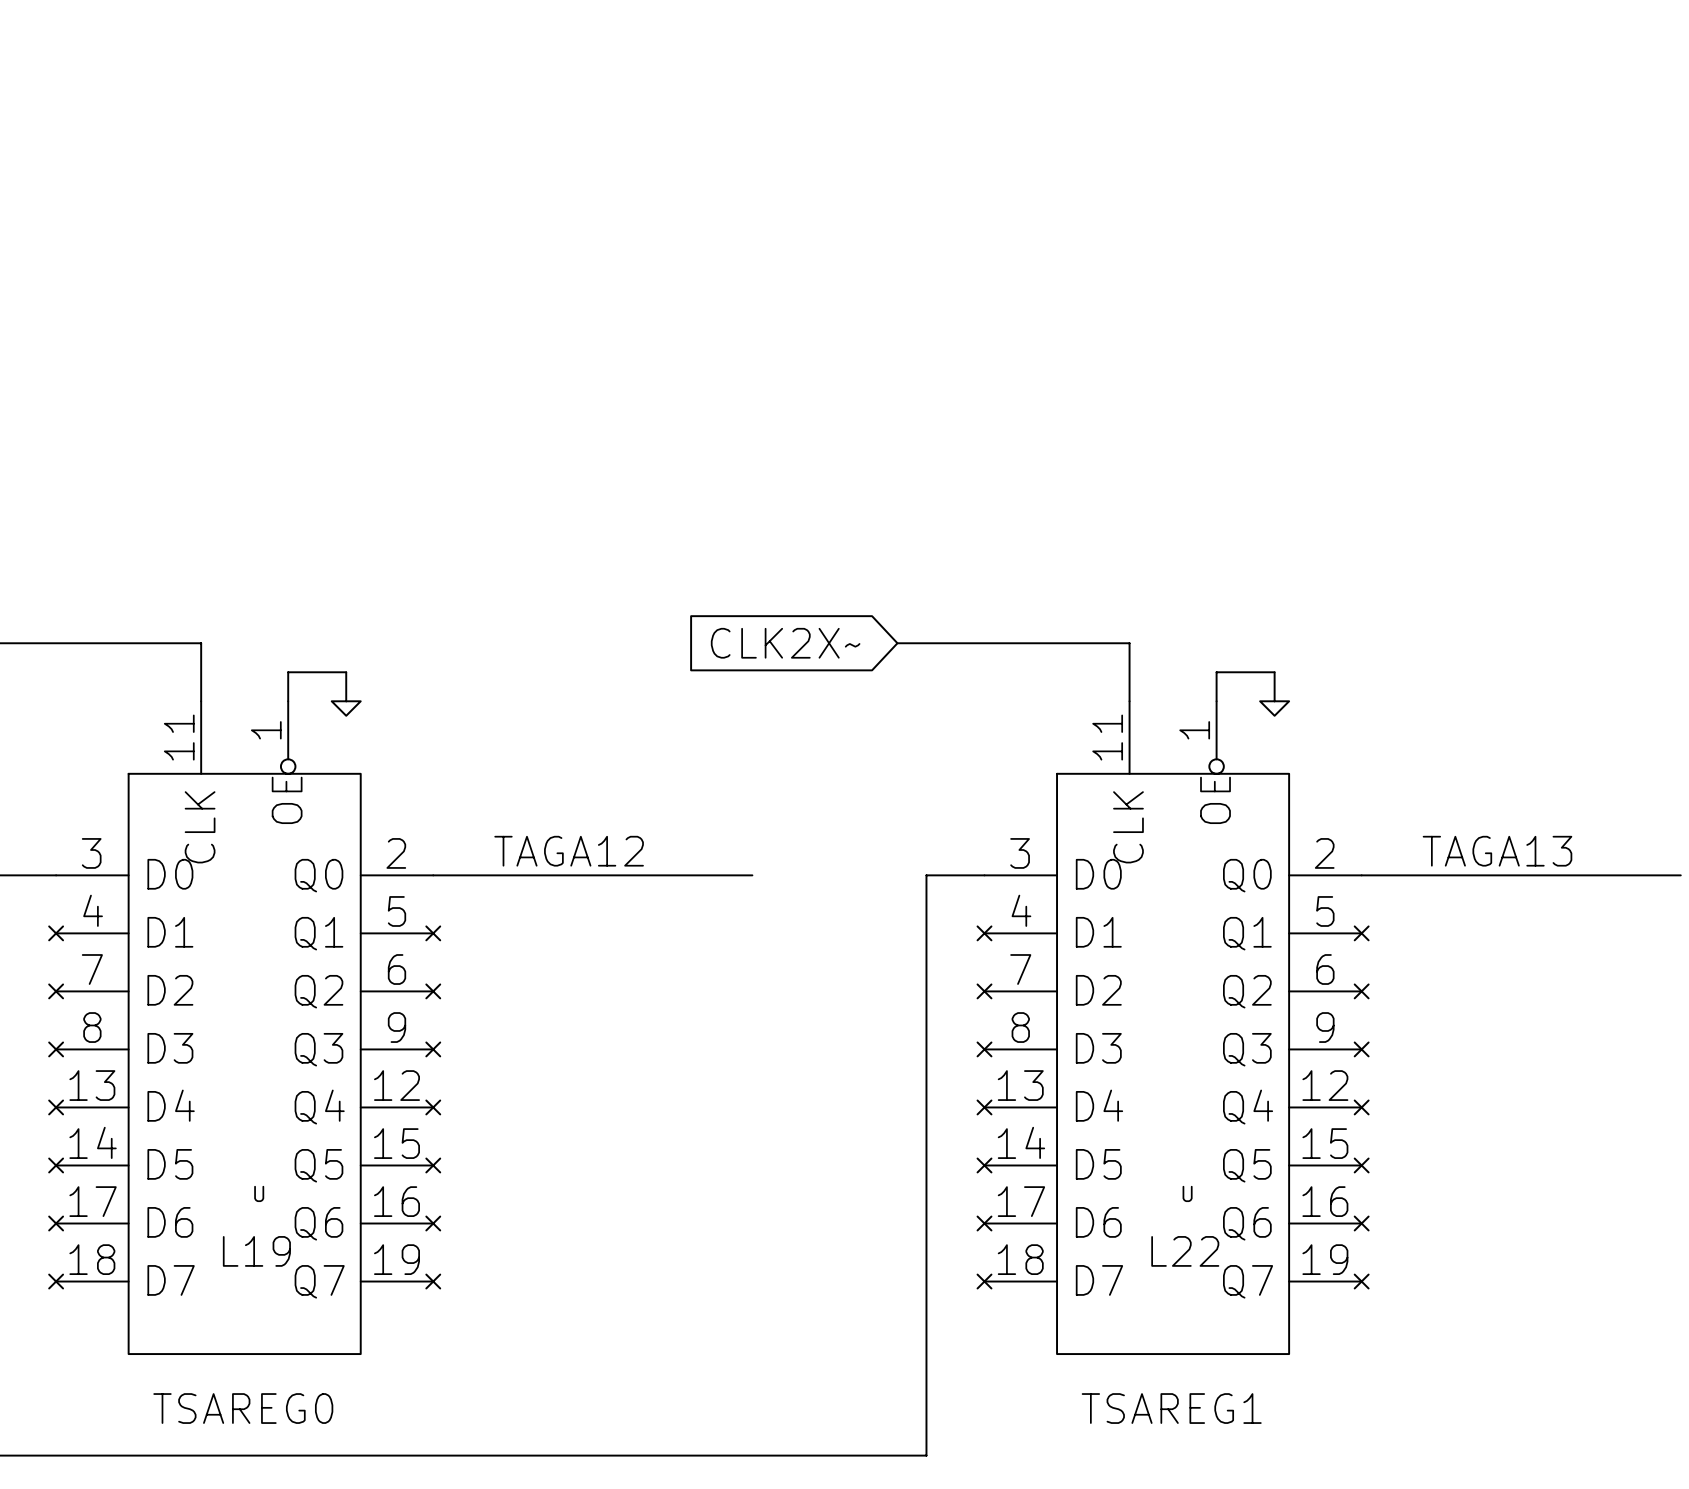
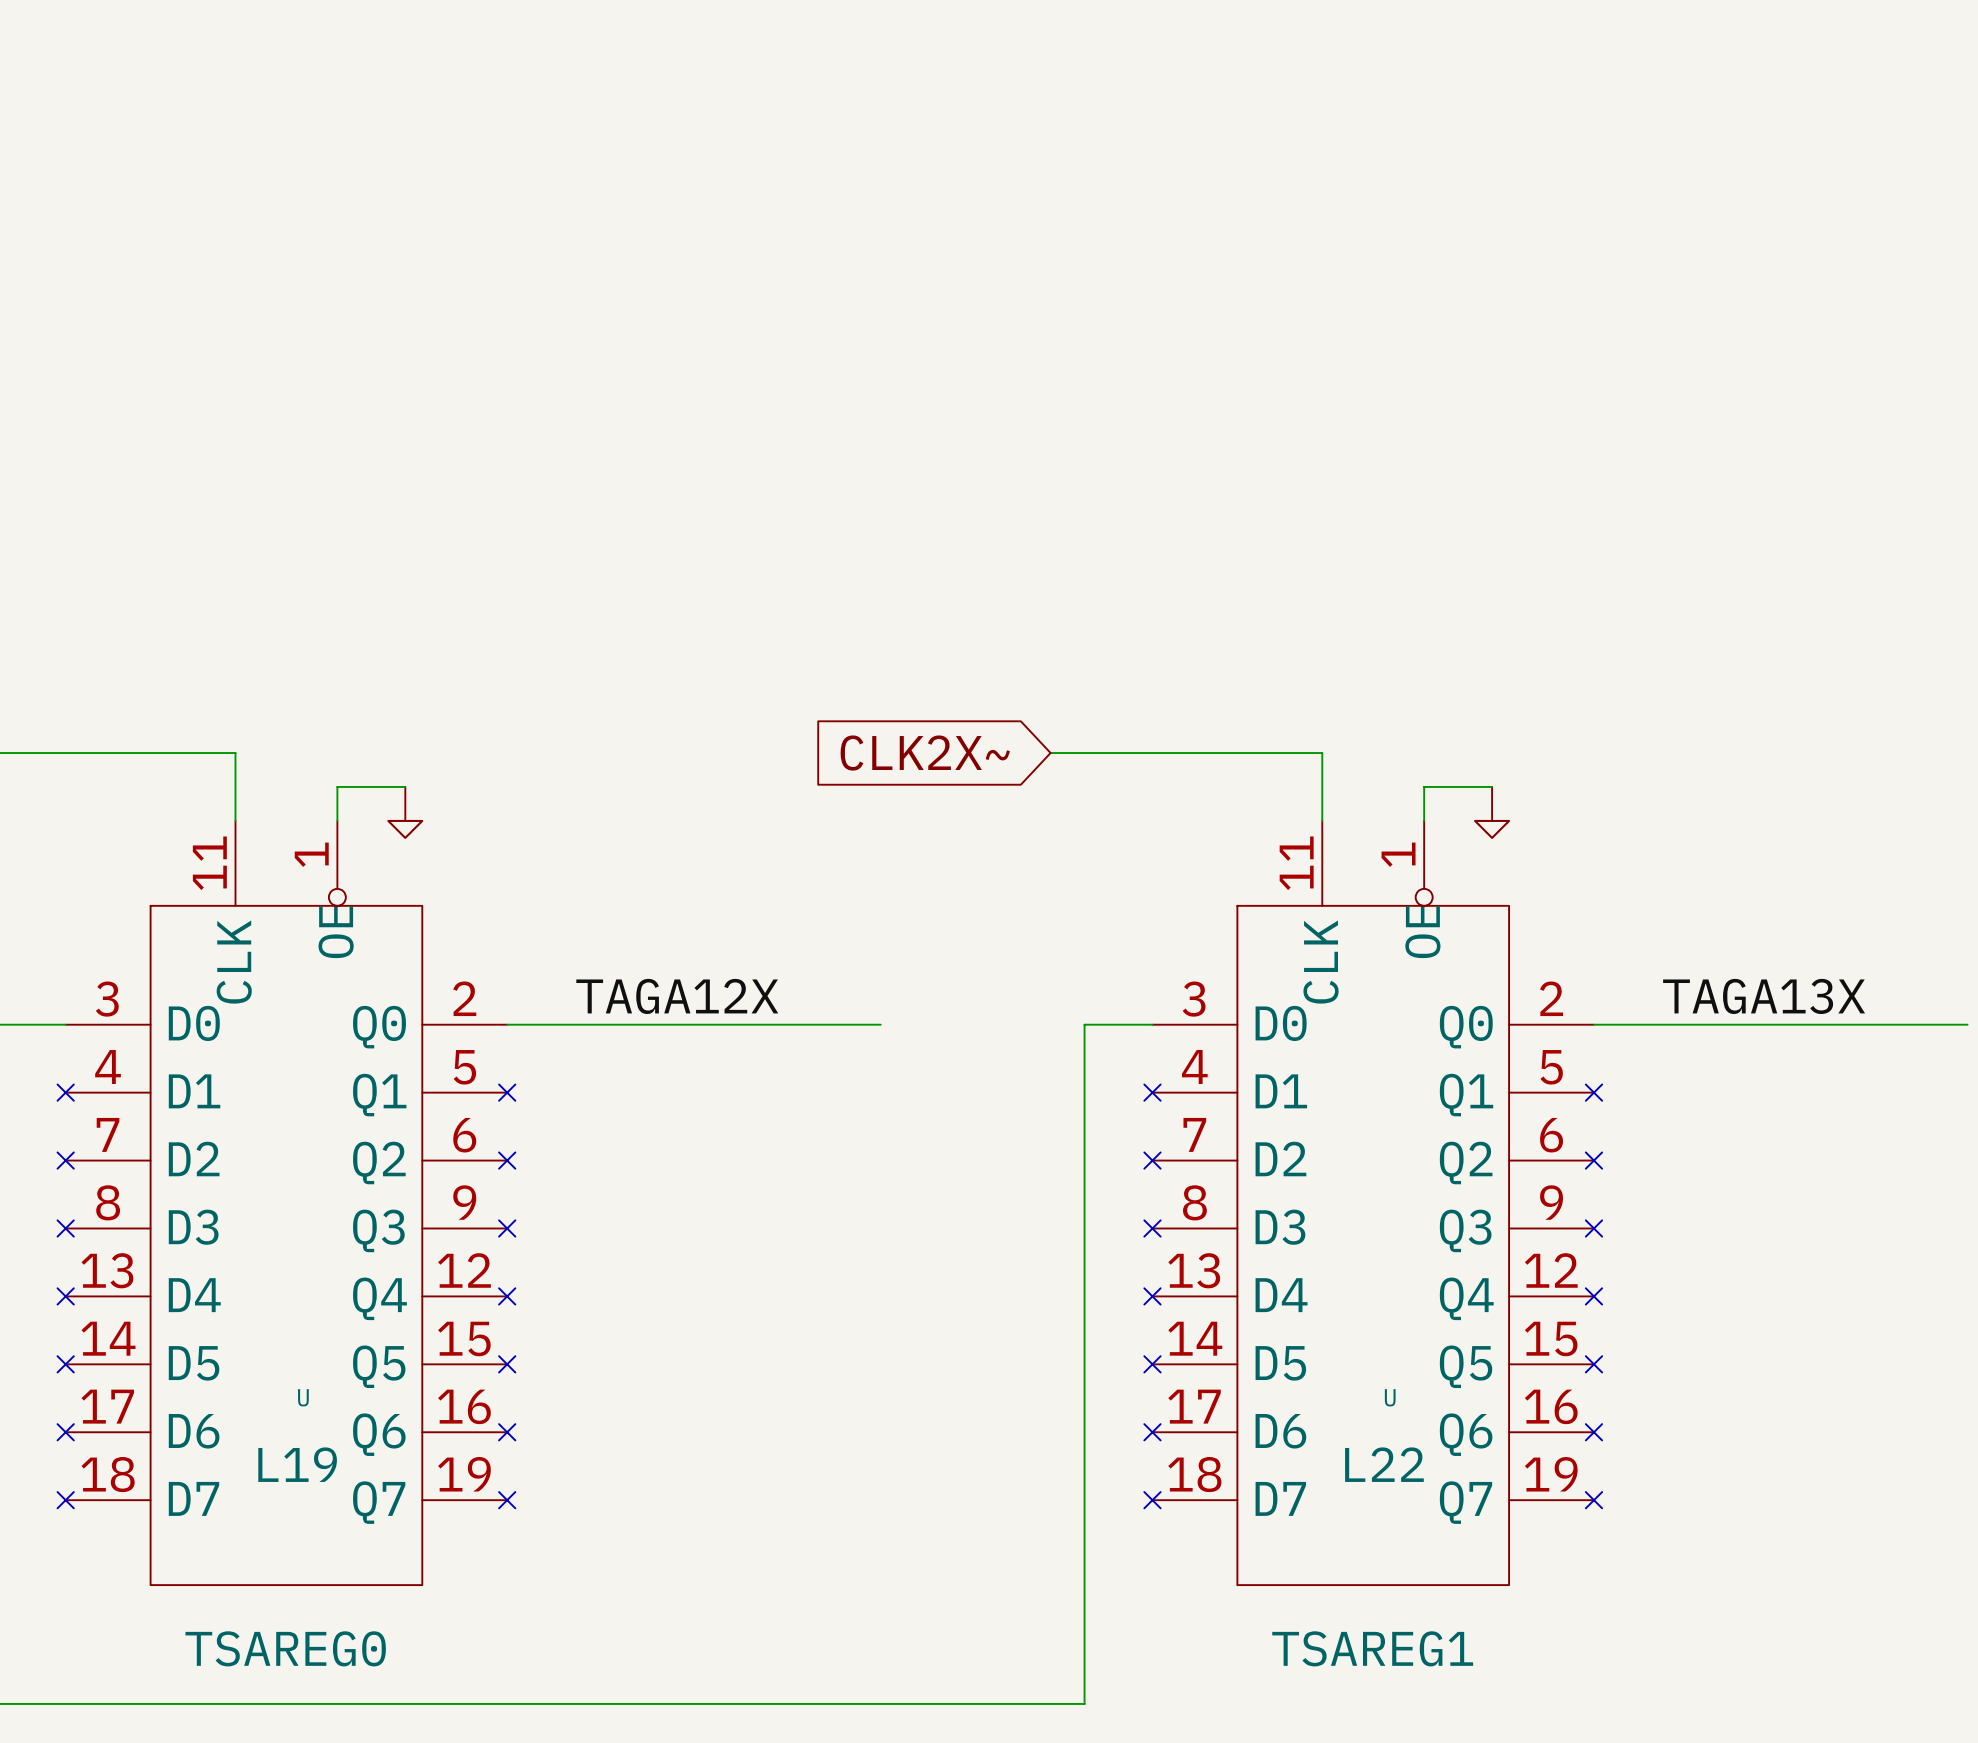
label: TAGA12 (569, 851) -> TAGA12X (677, 996)
label: TAGA13 (1497, 851) -> TAGA13X (1764, 996)

